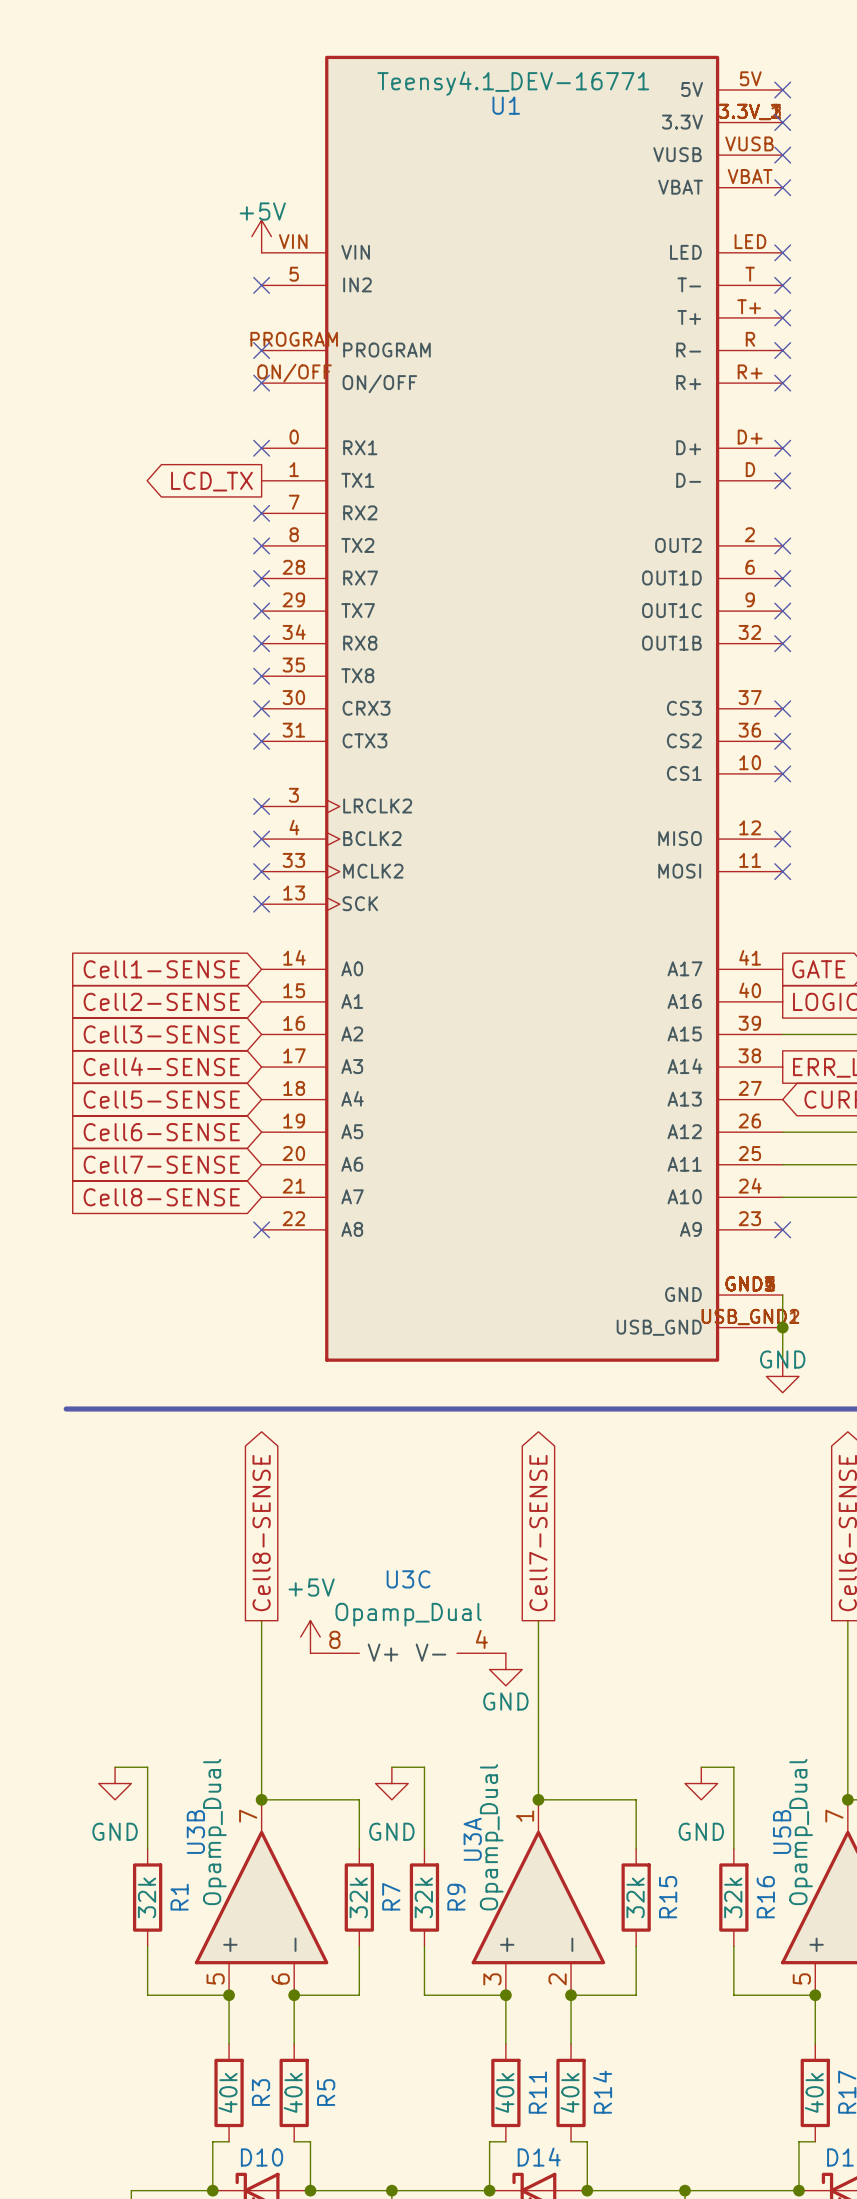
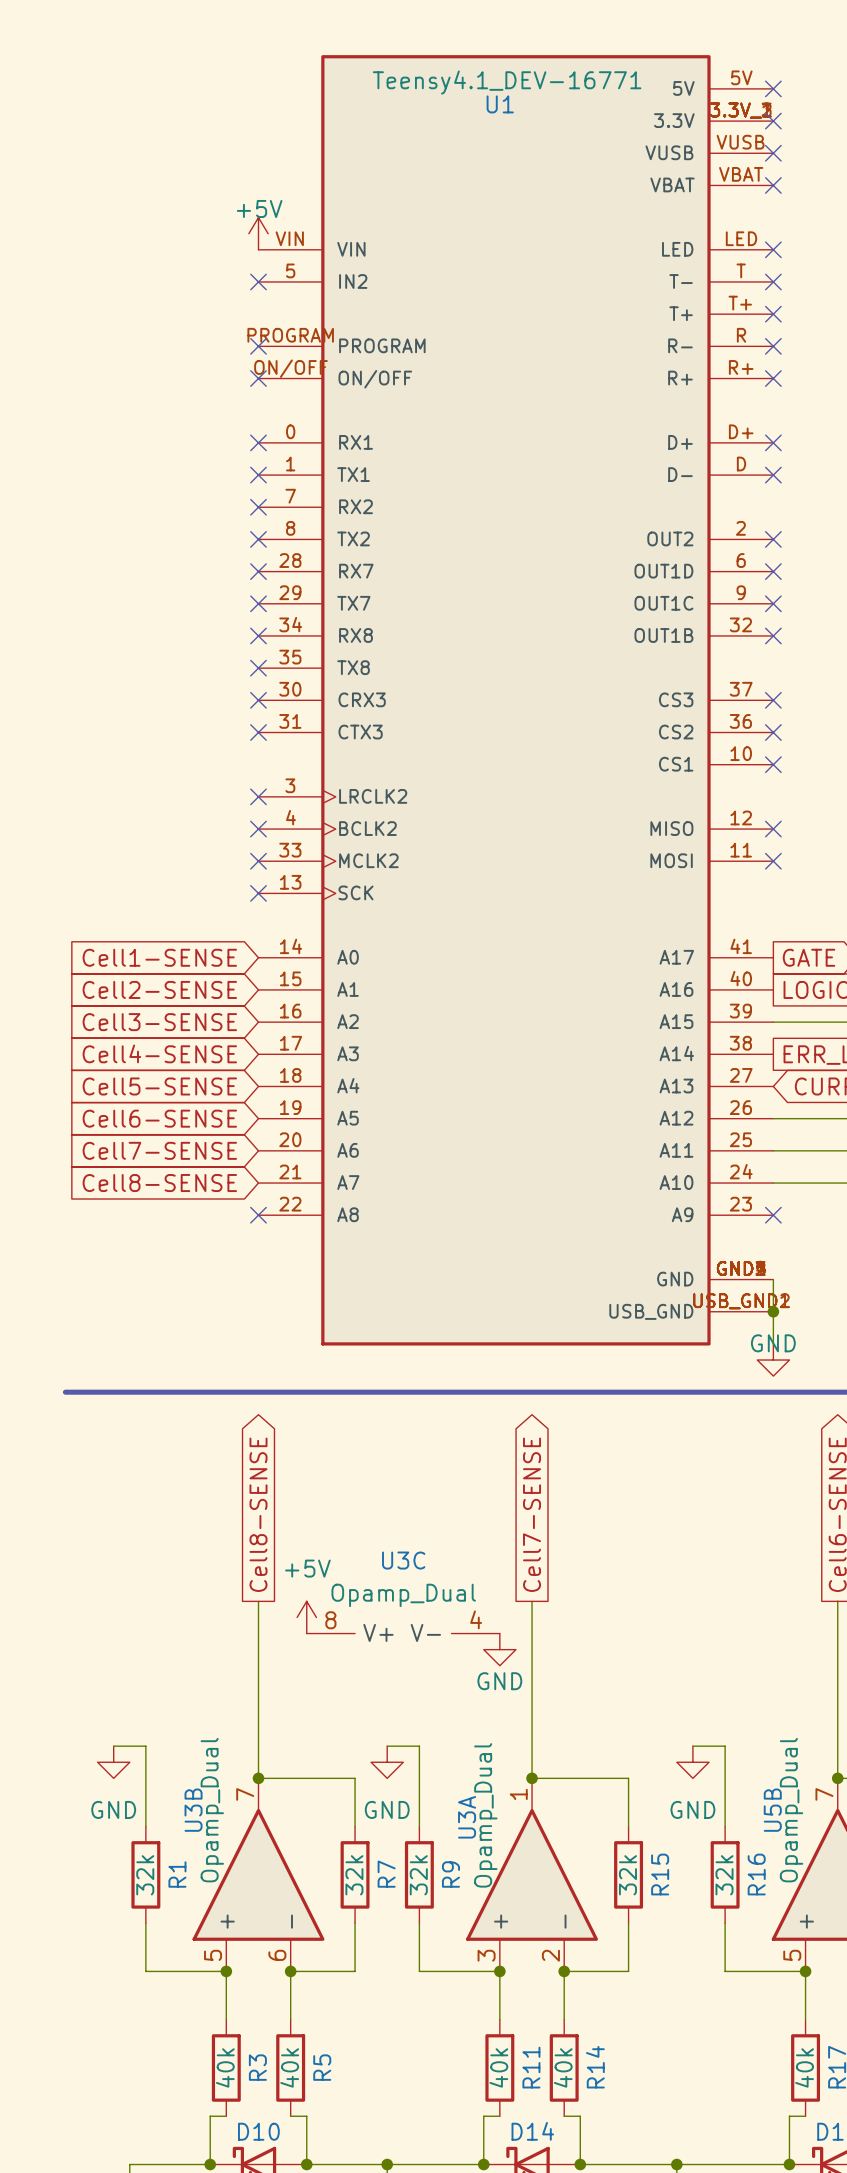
no-connect mark: none -> (258, 475)
global label: LCD_TX (211, 481) -> none

